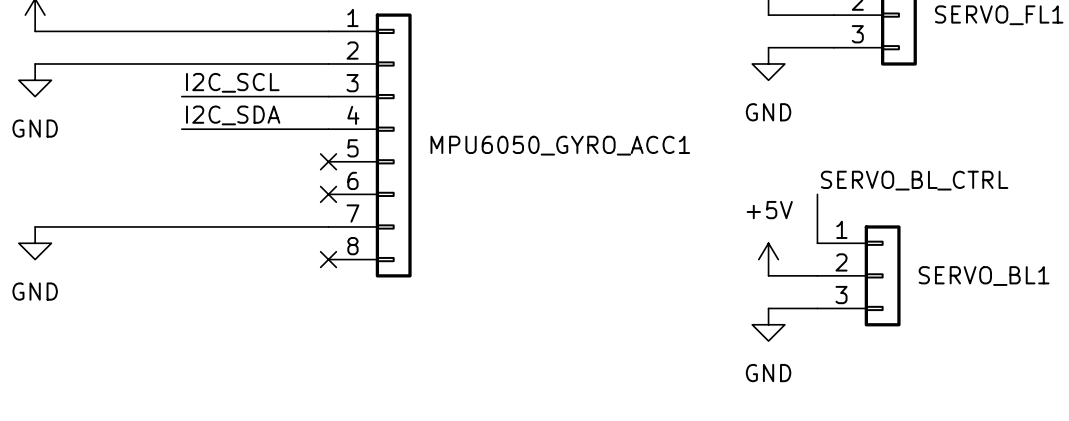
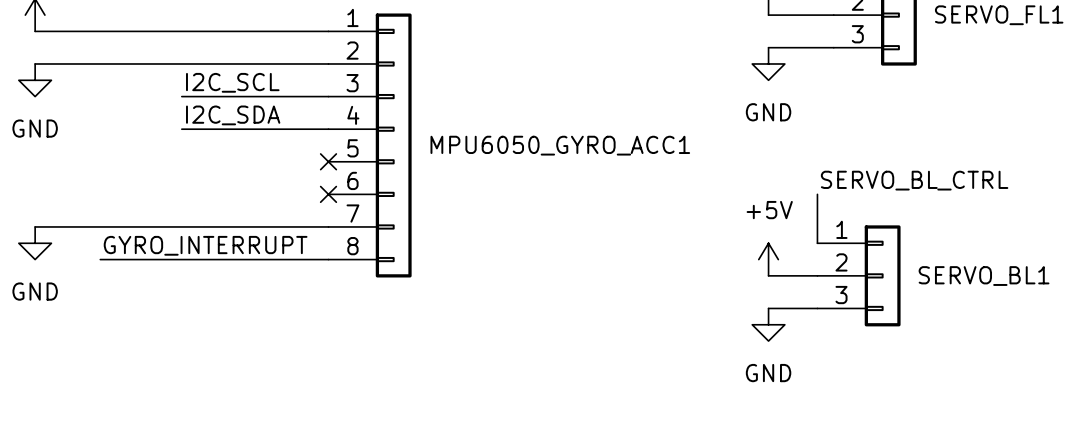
label: none -> GYRO_INTERRUPT (205, 245)
wire: none -> (100, 259) (328, 259)
no-connect mark: (328, 259) -> none

